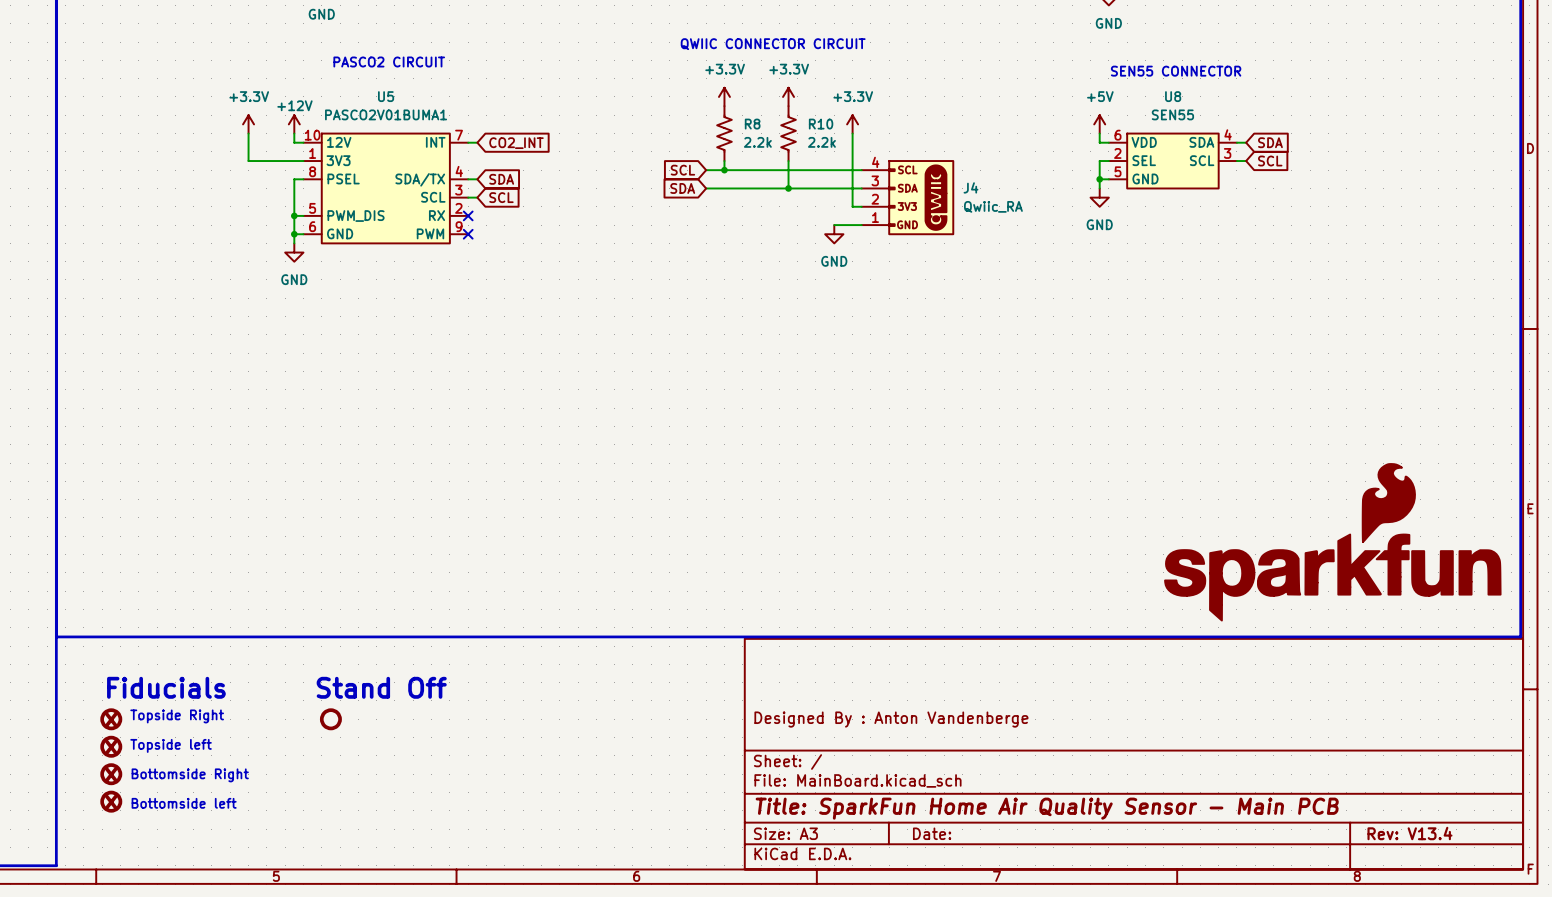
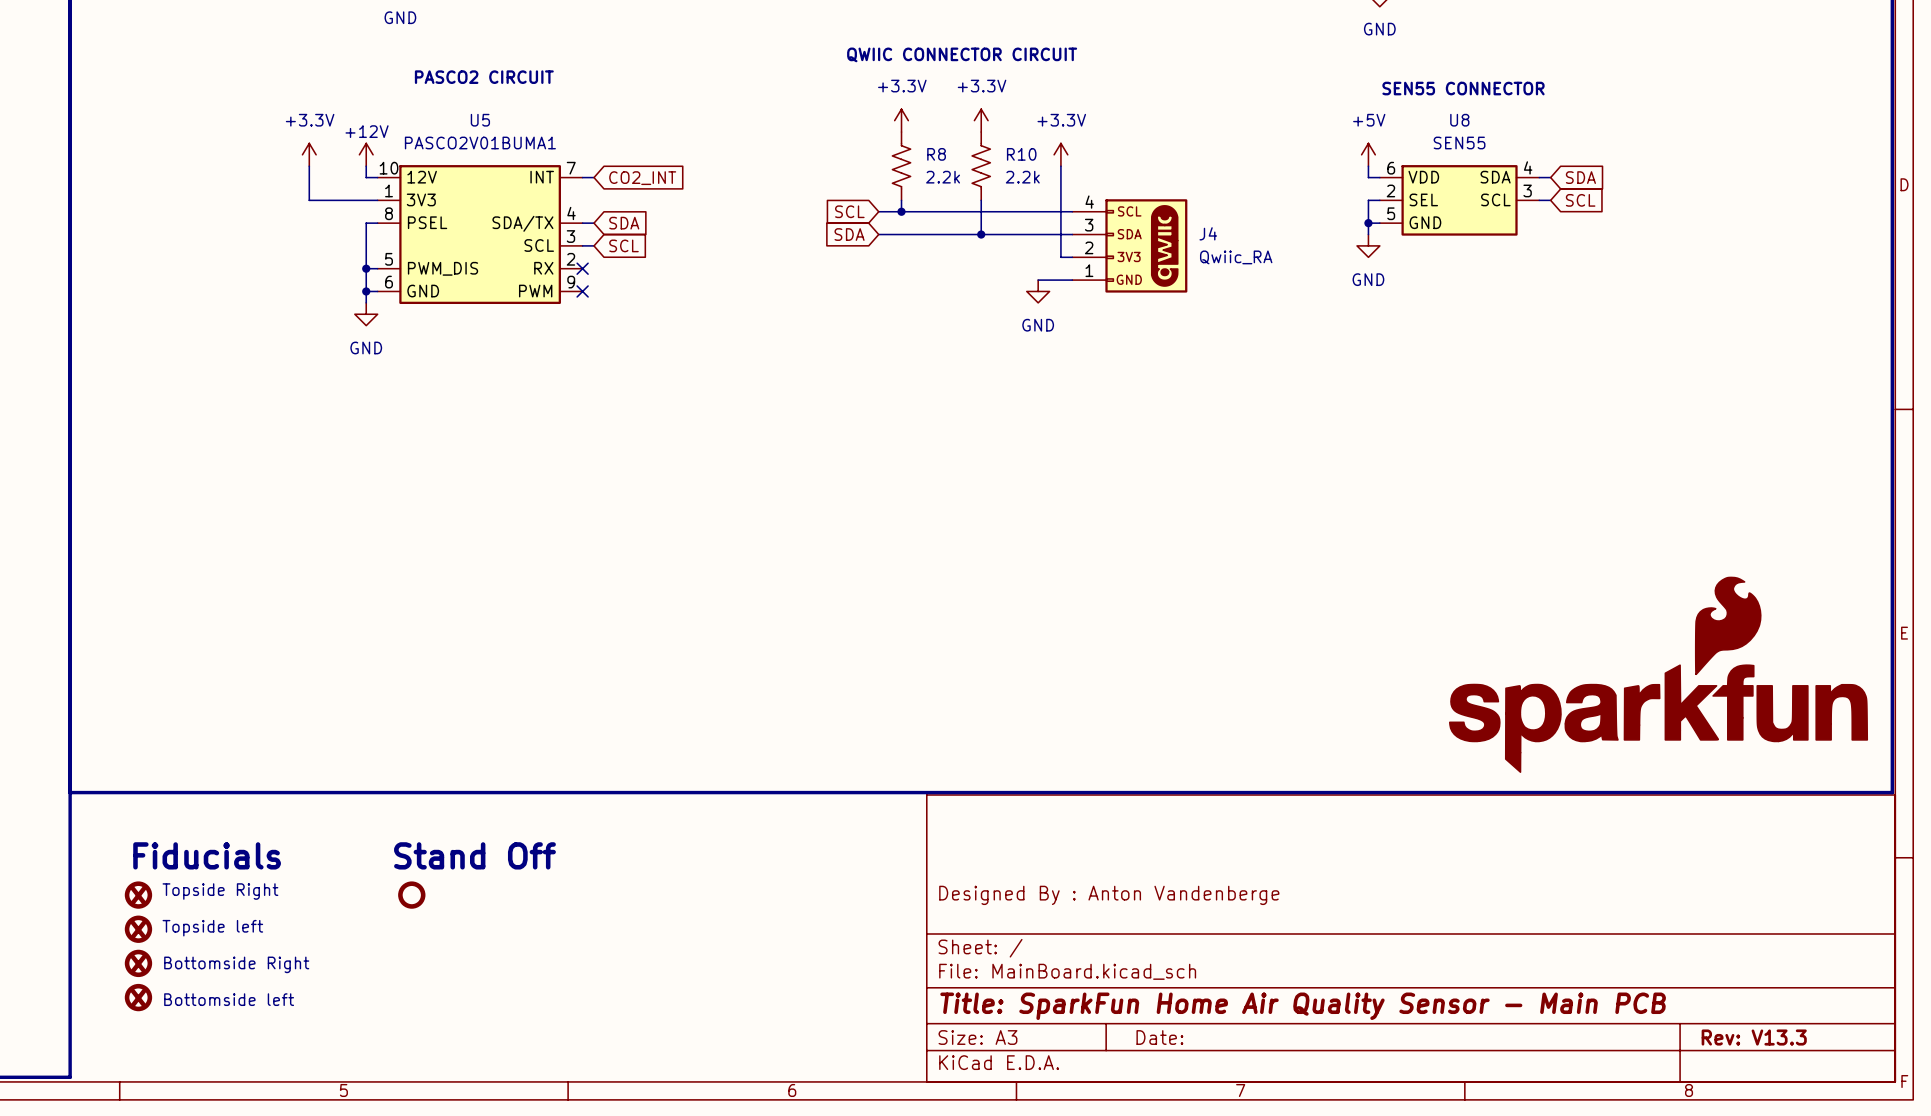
title block: Rev: V13.4 (1409, 833) -> Rev: V13.3 (1754, 1037)

